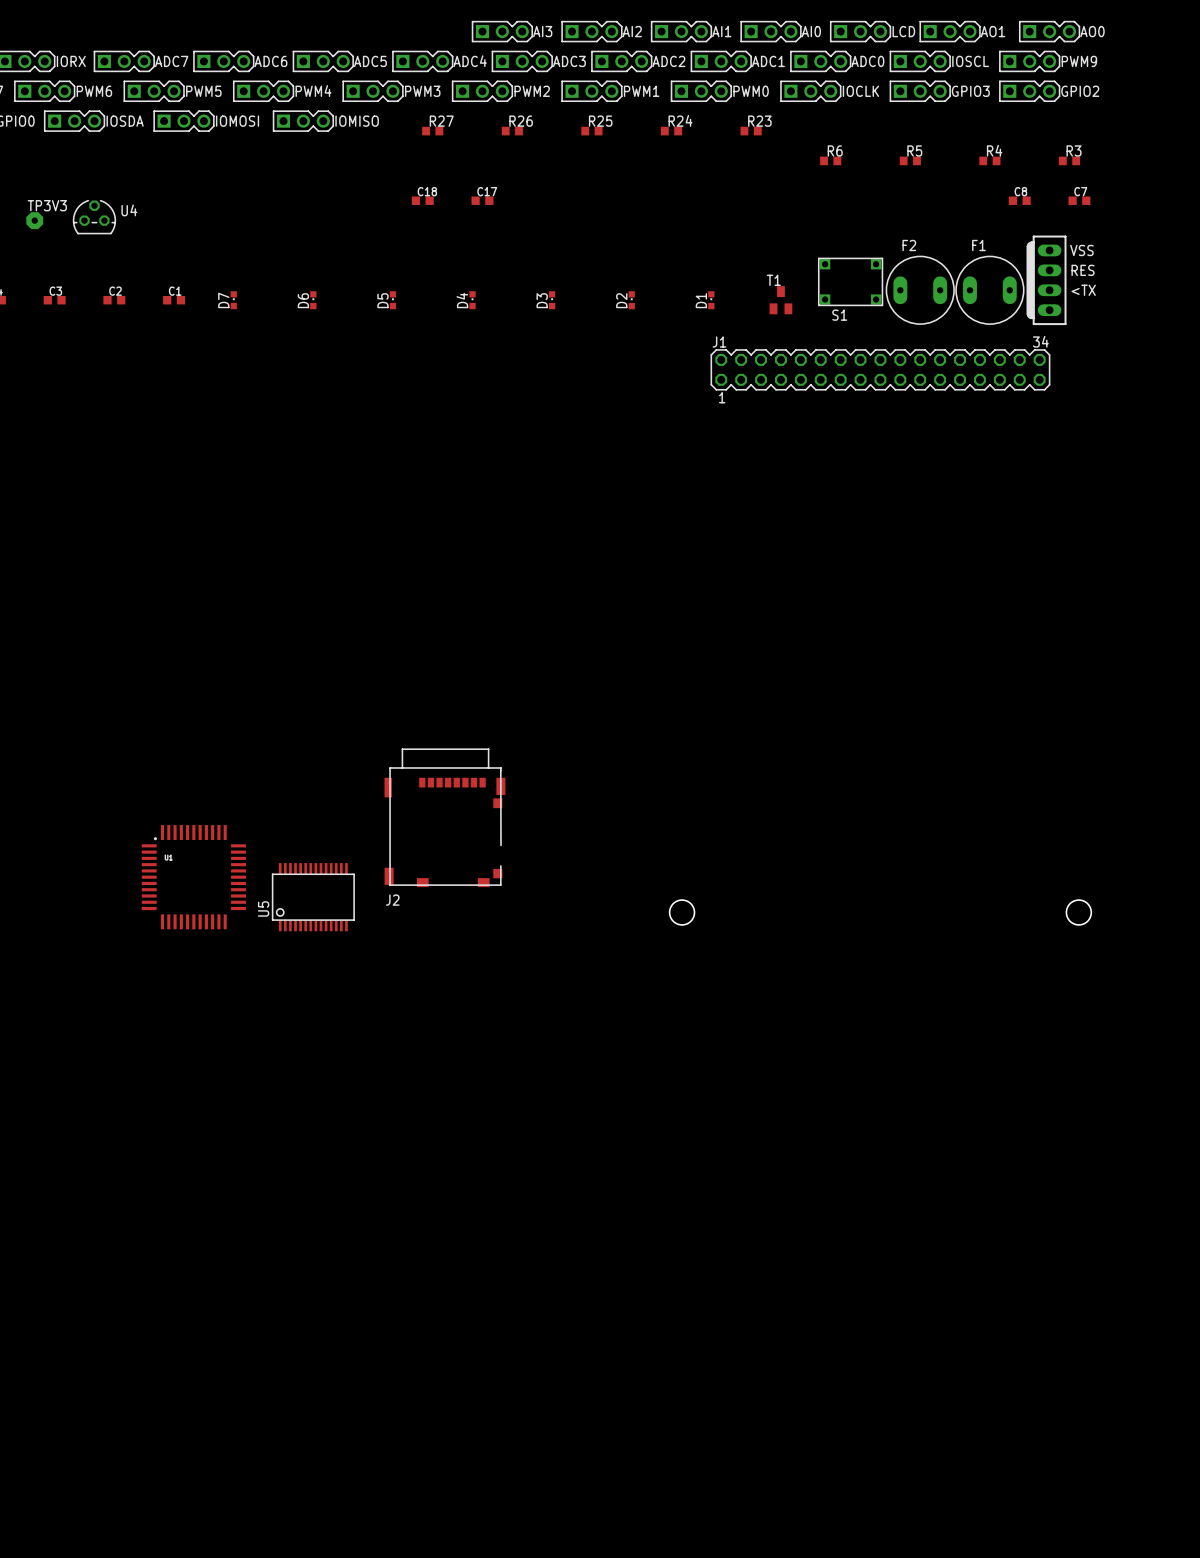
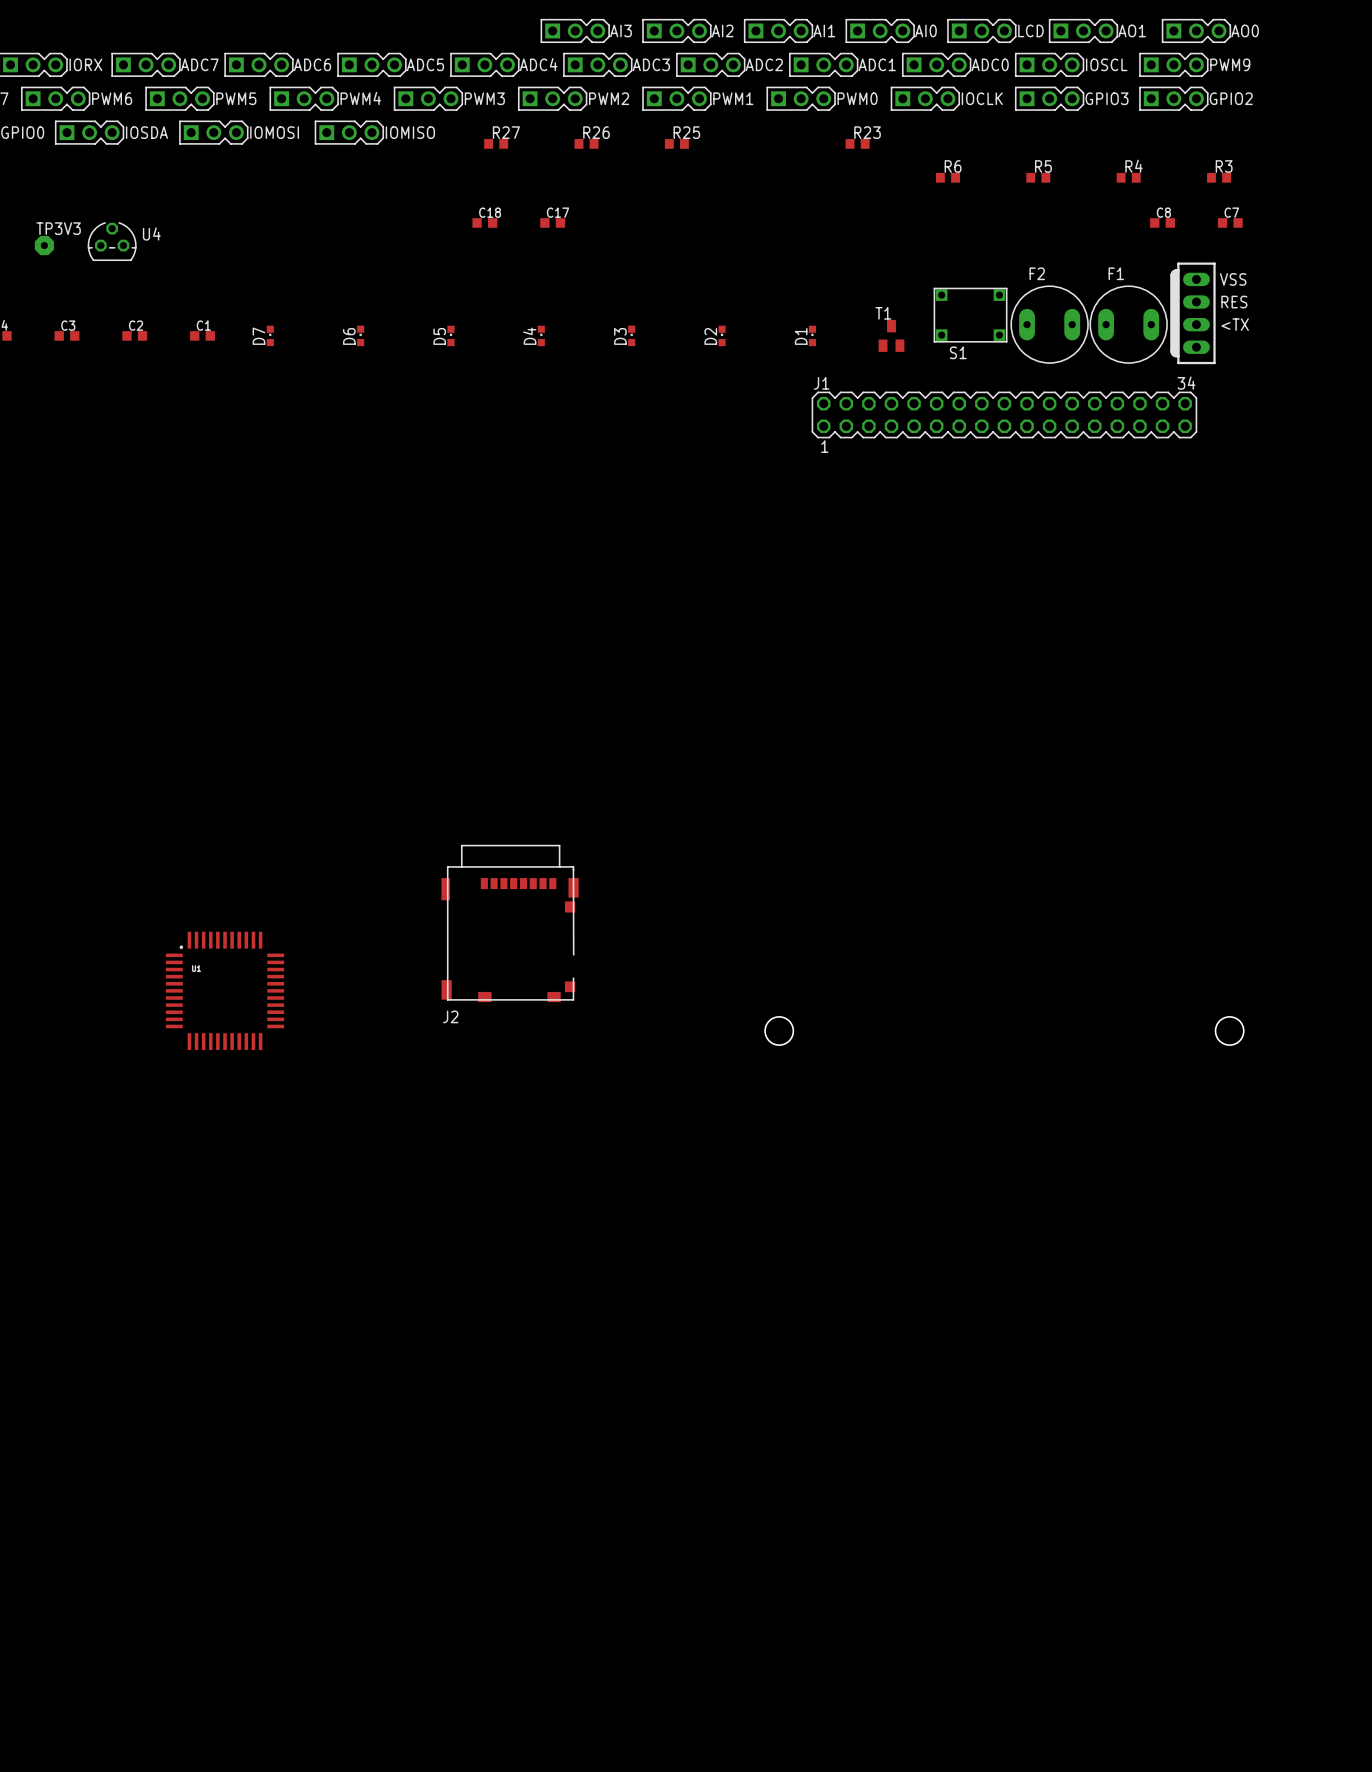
R24: (671, 131) -> none
U5: (313, 897) -> none

